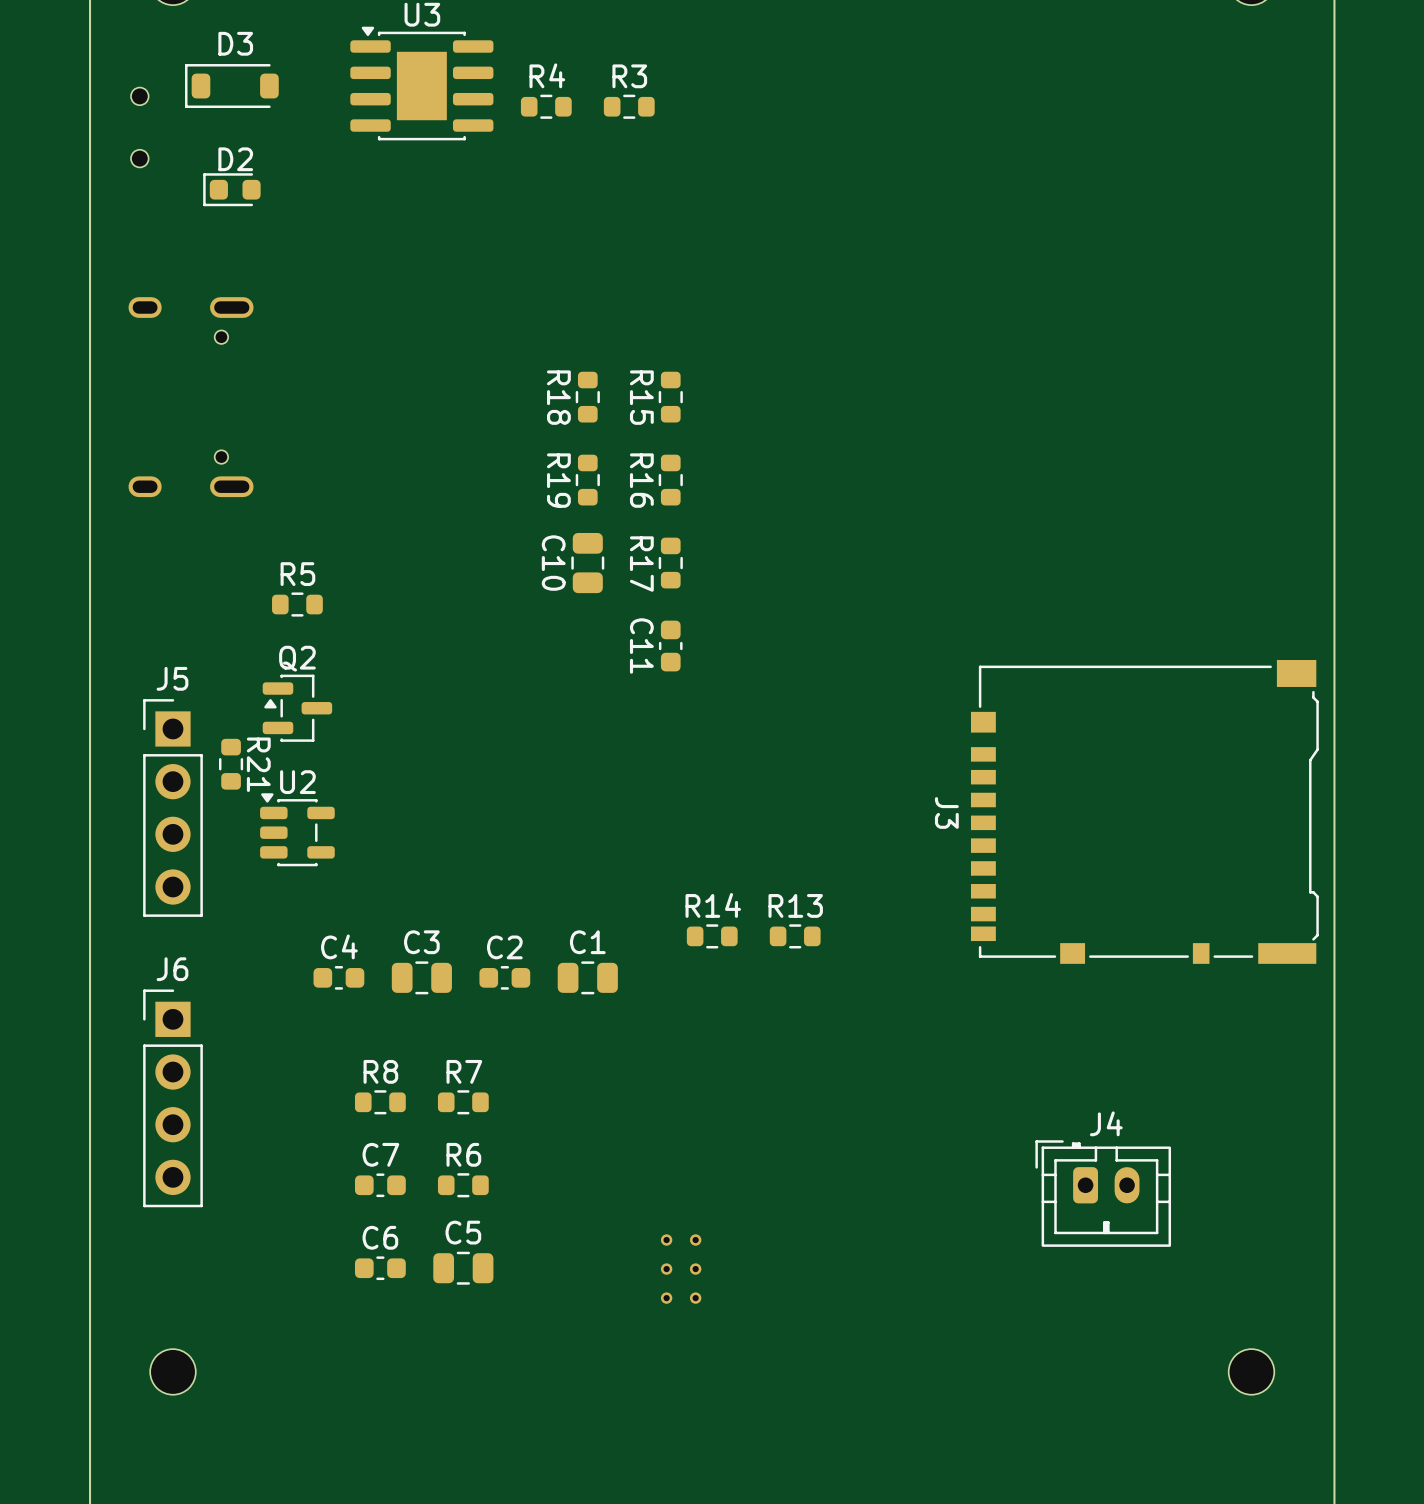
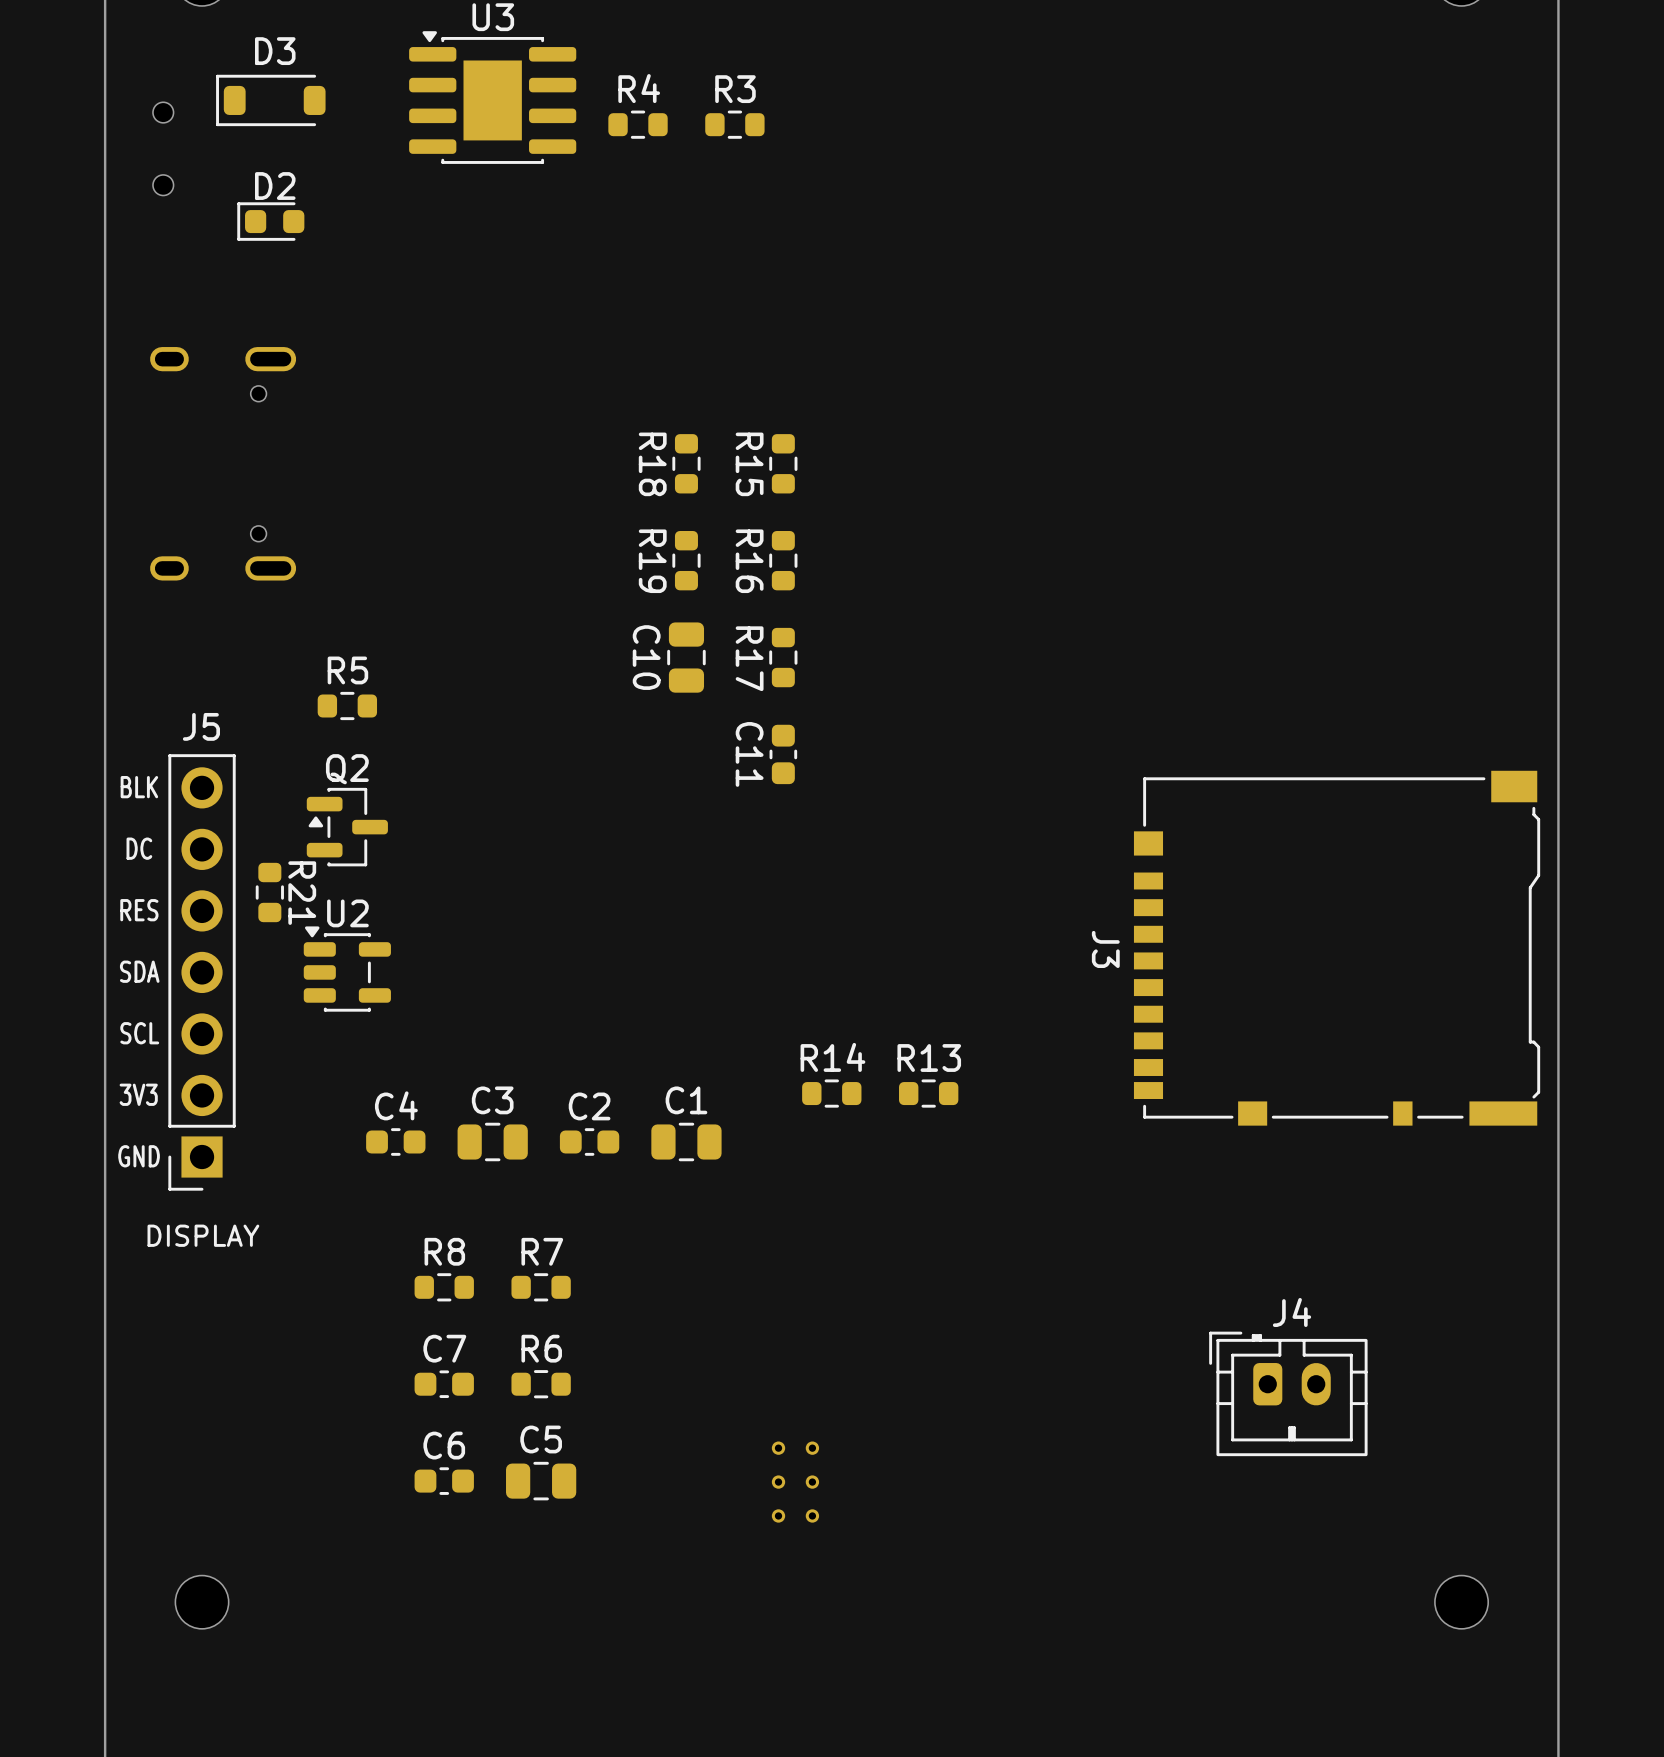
text: none -> BLK (139, 787)
J5 name position: J5 (172, 678) -> J5 (201, 726)
J5 footprint: [143, 699, 203, 917] -> [168, 754, 236, 1191]
text: none -> DC (139, 848)
text: none -> RES (139, 910)
text: none -> SDA (139, 971)
text: none -> SCL (139, 1033)
text: none -> 3V3 (138, 1094)
text: none -> GND (139, 1156)
text: none -> DISPLAY (203, 1235)
J6: (172, 1098) -> none

